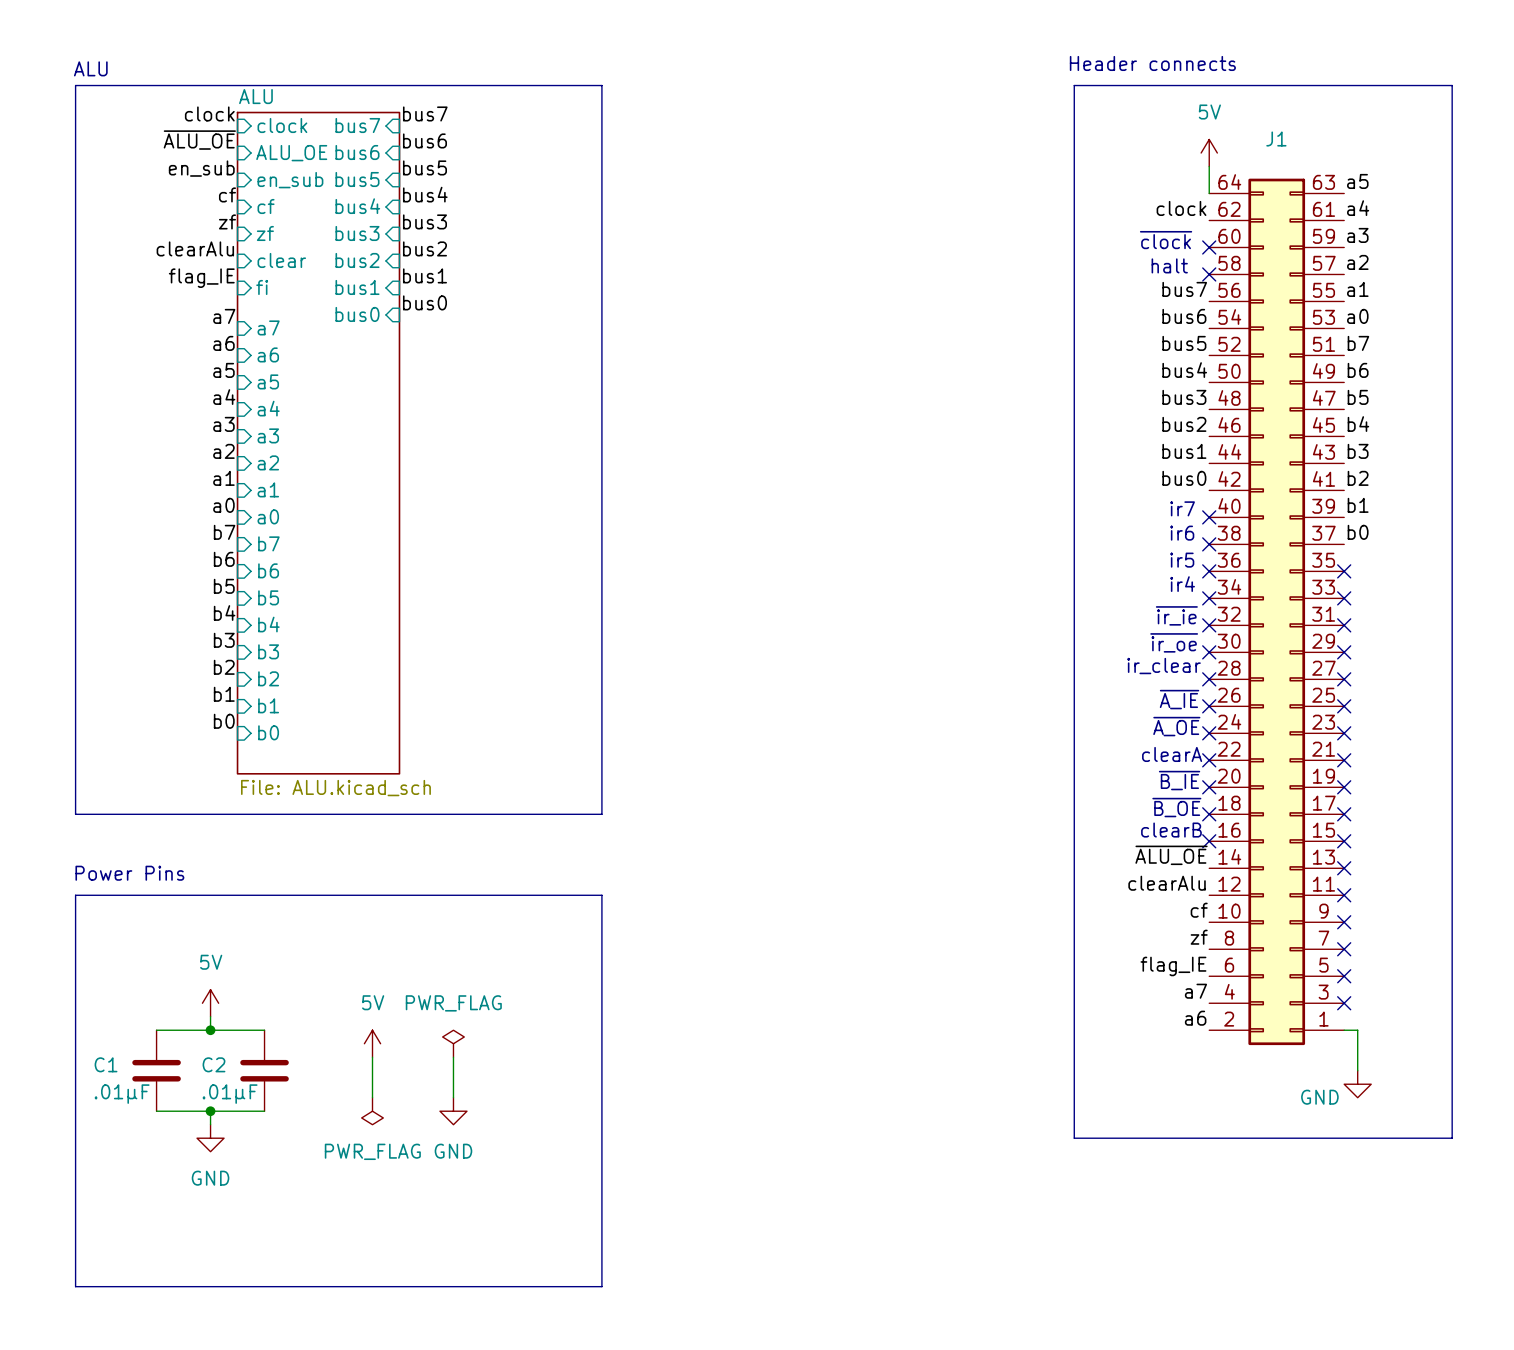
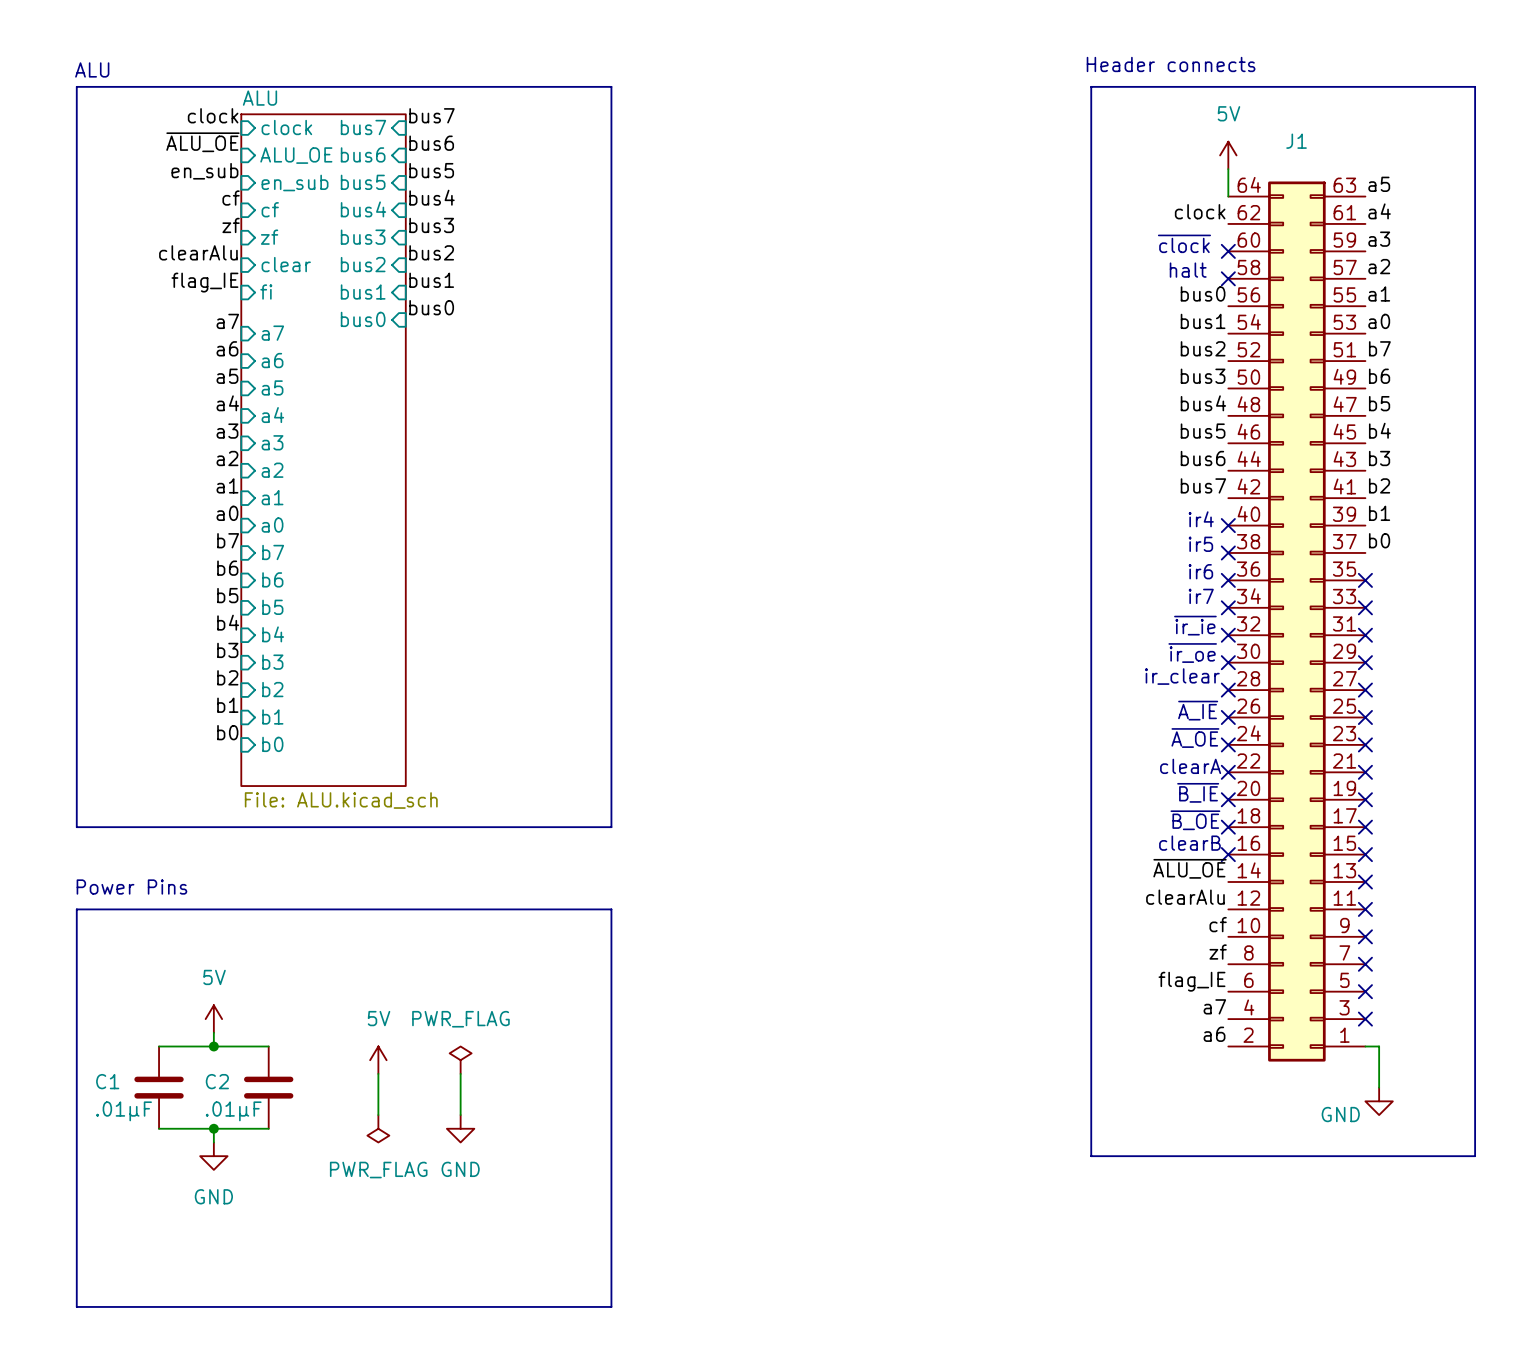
label: bus7 (1184, 289) -> bus0 (1203, 293)
label: bus6 (1184, 316) -> bus1 (1203, 321)
label: bus5 (1184, 343) -> bus2 (1203, 348)
label: bus4 (1184, 370) -> bus3 (1203, 376)
label: bus3 (1184, 397) -> bus4 (1203, 403)
label: bus2 (1184, 424) -> bus5 (1203, 431)
label: bus1 (1184, 451) -> bus6 (1203, 458)
label: bus0 (1184, 478) -> bus7 (1203, 485)
text: ir7 (1182, 508) -> ir4 (1201, 519)
text: ir6 (1182, 533) -> ir5 (1200, 544)
text: ir5 (1182, 560) -> ir6 (1200, 571)
text: ir4 (1182, 584) -> ir7 (1201, 596)

